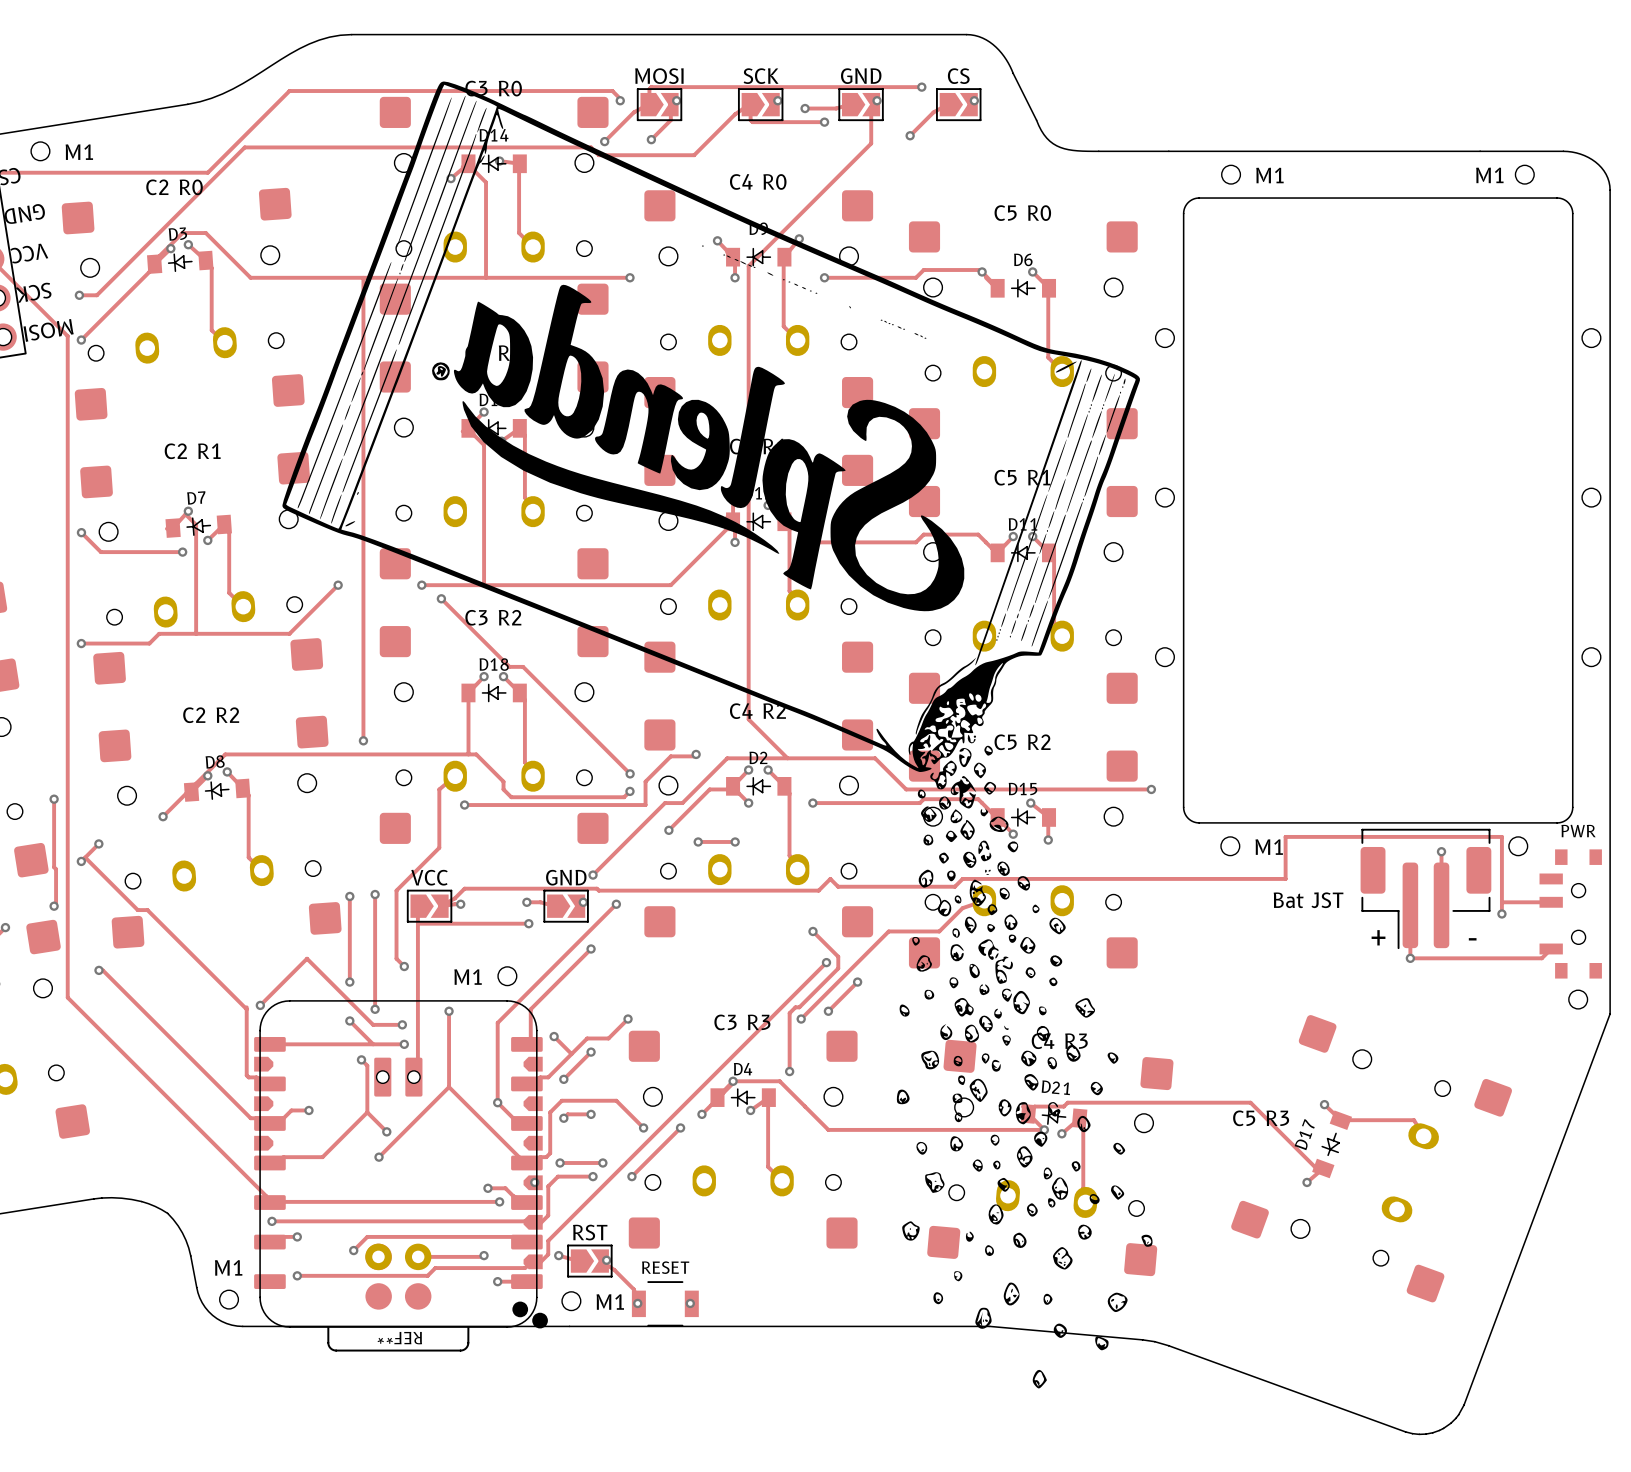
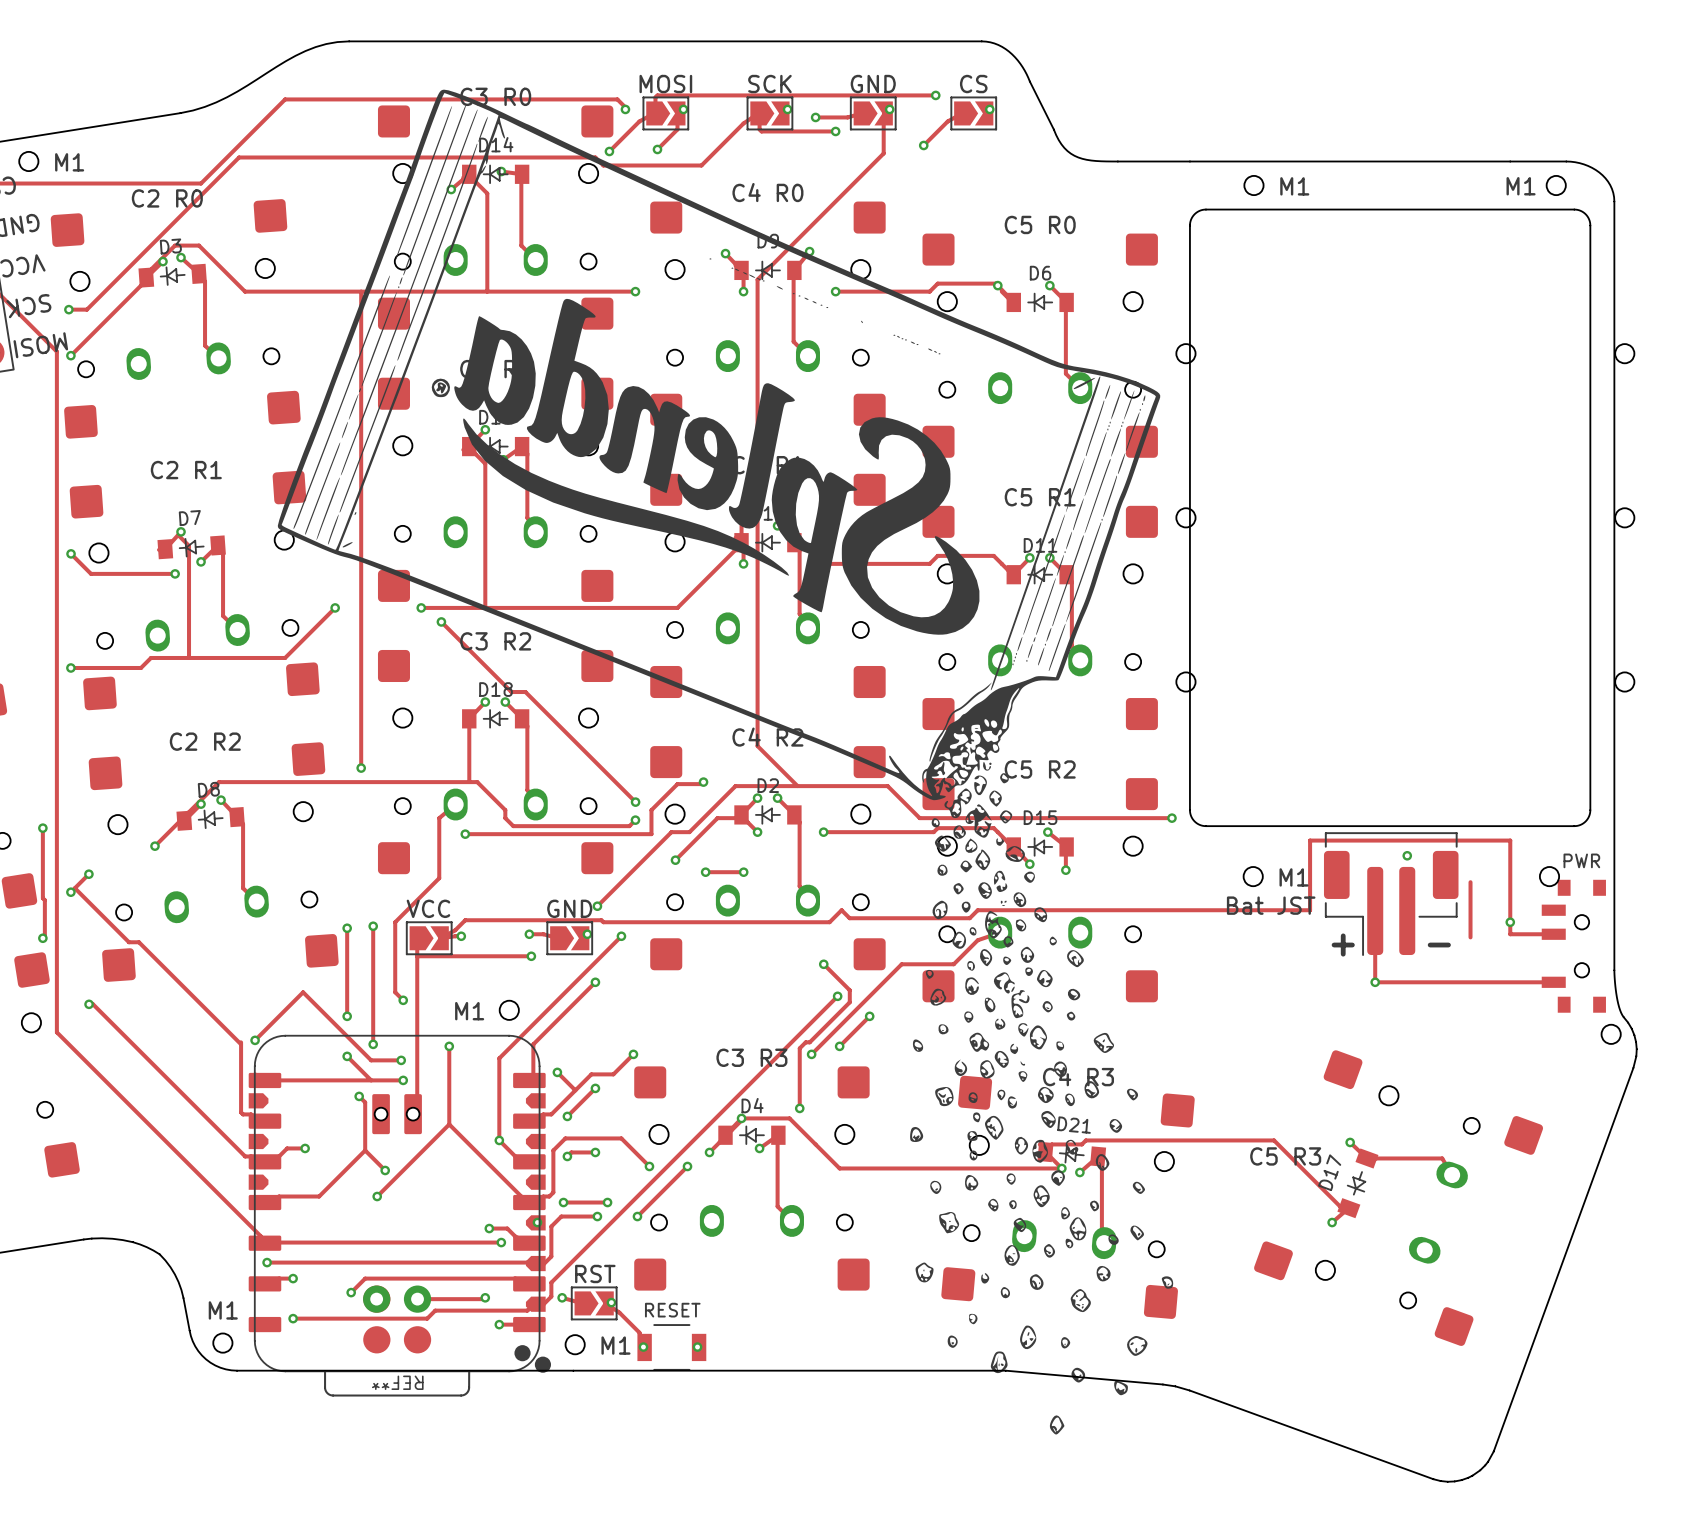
board edge: (1534, 151) (1567, 151) (1584, 155) (1601, 167) (1609, 185) (1610, 1013) (1464, 1405) -> (1566, 161) (1583, 164) (1599, 172) (1610, 185) (1614, 197) (1614, 972) (1618, 1003) (1622, 1015) (1634, 1035) (1636, 1056) (1493, 1451)
board edge: (1199, 198) (1188, 202) (1183, 213) (1183, 807) (1185, 814) (1191, 821) (1199, 822) (1557, 822) (1568, 818) (1572, 807) (1572, 213) (1570, 206) (1564, 199) (1542, 198) -> (1221, 209) (1198, 211) (1191, 217) (1189, 225) (1189, 810) (1194, 821) (1205, 826) (1574, 826) (1581, 824) (1588, 817) (1590, 810) (1590, 225) (1585, 214) (1574, 209)
via: none -> (1407, 855)
via: (1441, 851) -> none
track: (1285, 878) (1285, 836) (1501, 836) (1501, 913) -> (1310, 910) (1310, 840) (1510, 840) (1510, 934) (1532, 934)
track: none -> (1375, 910) (1375, 982) (1553, 982)
Bat JST position: (1425, 888) -> (1391, 894)
via: none -> (1510, 922)
track: (1522, 902) (1551, 902) -> none
track: (1410, 905) (1410, 958) (1541, 958) (1551, 948) -> none
via: (1501, 913) -> none
PWR position: (1570, 913) -> (1573, 946)
text position: + (1378, 937) -> + (1343, 945)
text position: - (1472, 939) -> - (1439, 945)
via: none -> (1375, 982)
via: (1410, 958) -> none

